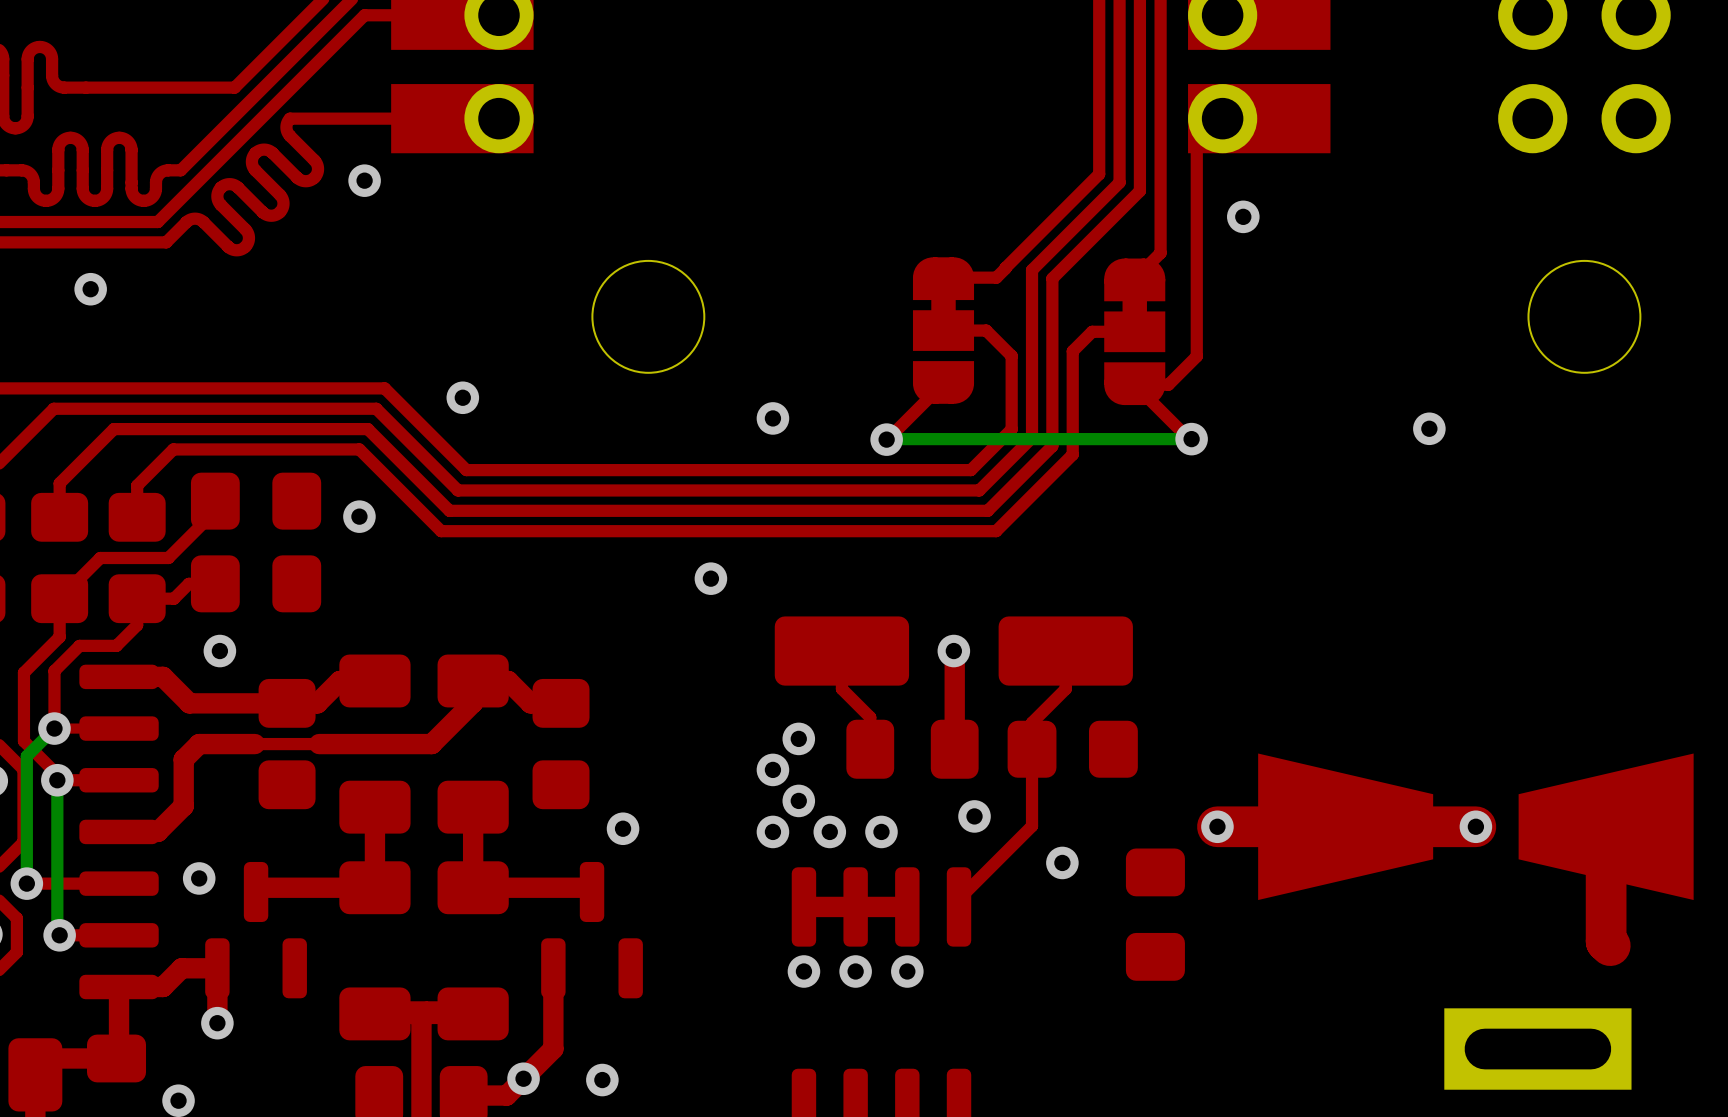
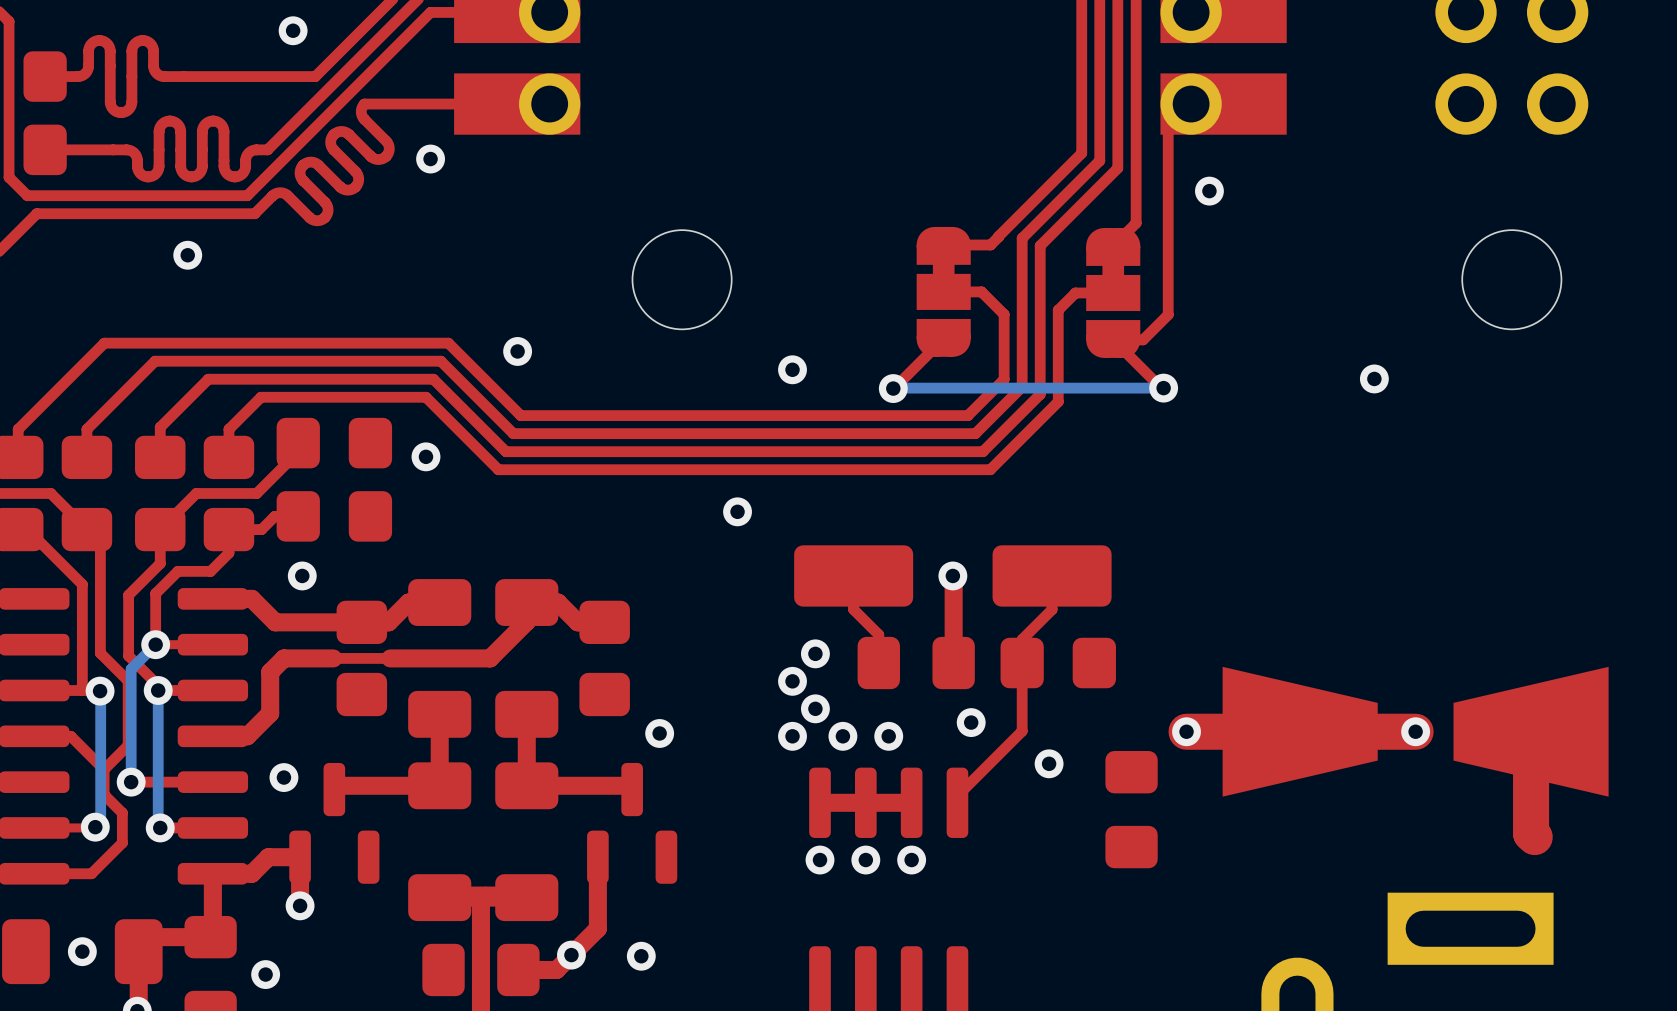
via: none -> (293, 30)

